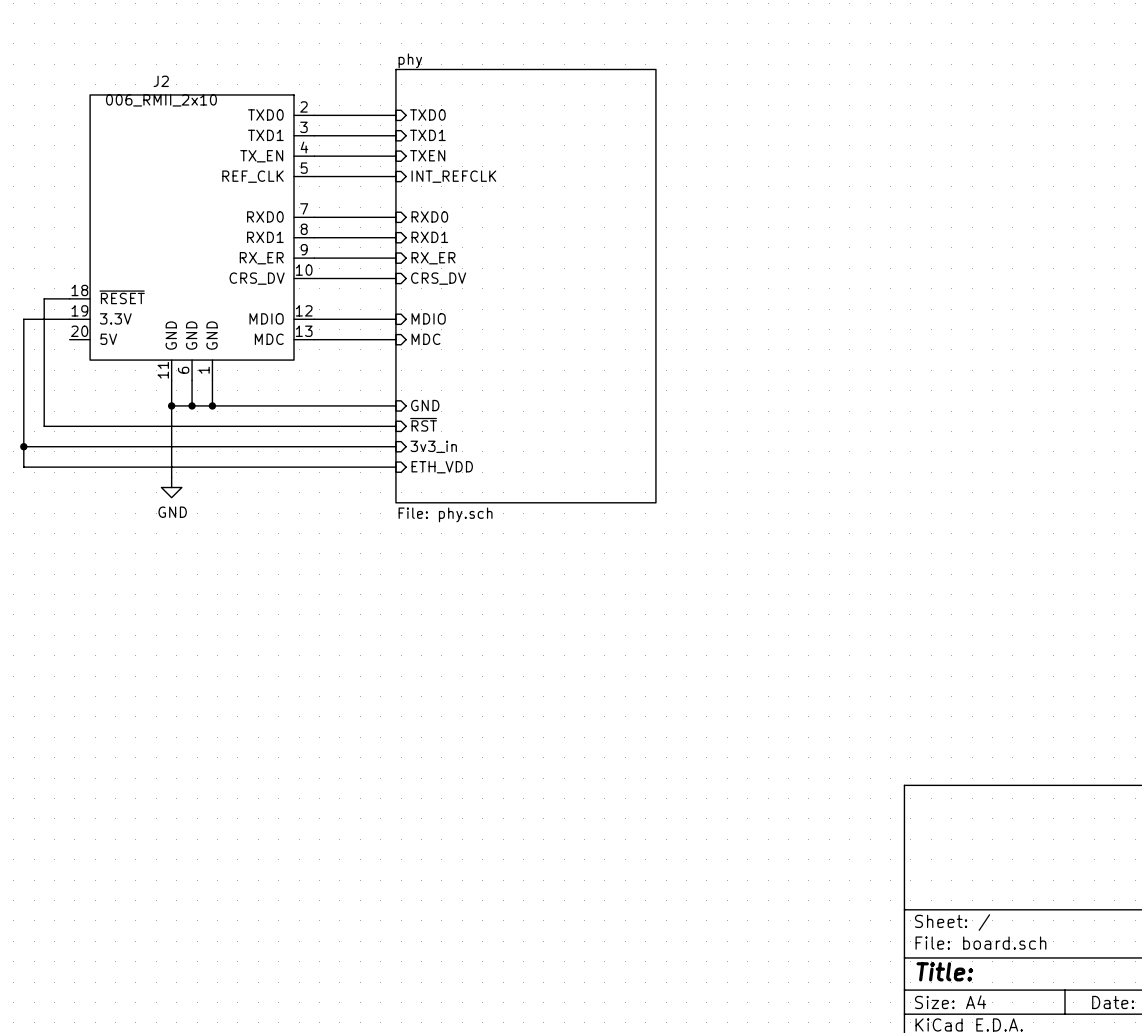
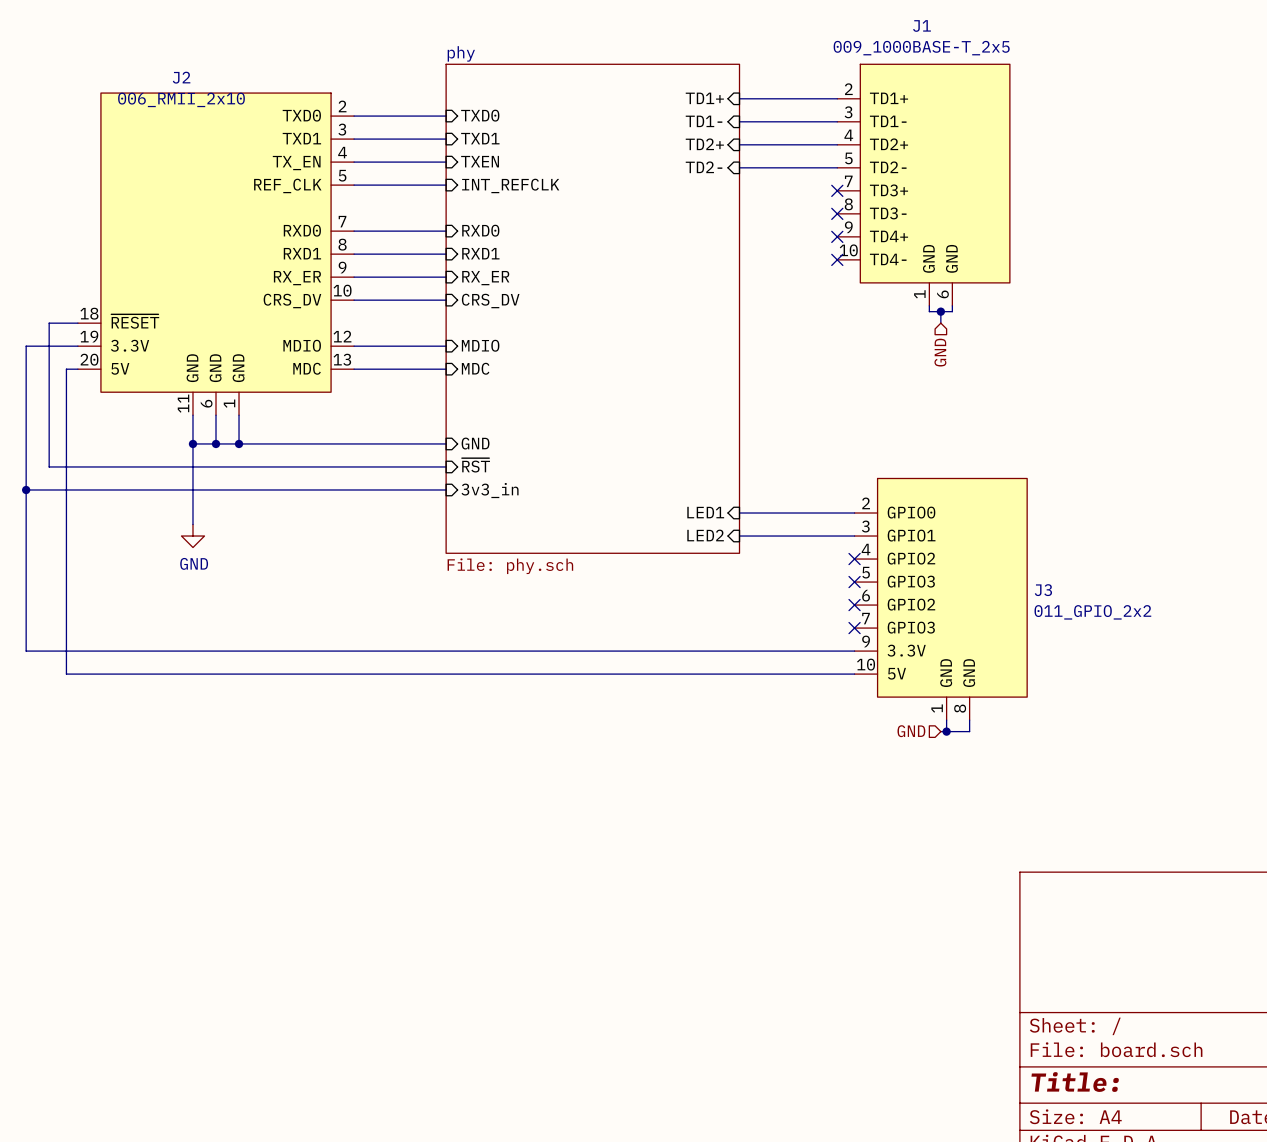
sheet pin: none -> TD1+ (704, 98)
wire: none -> (739, 98) (837, 98)
sheet pin: none -> TD1- (704, 121)
wire: none -> (739, 121) (837, 121)
sheet pin: none -> TD2+ (704, 144)
wire: none -> (739, 144) (837, 144)
sheet pin: none -> TD2- (704, 167)
wire: none -> (739, 167) (837, 167)
J1: none -> 009_1000BASE-T_2x5 (923, 185)
no-connect mark: none -> (837, 190)
no-connect mark: none -> (837, 213)
no-connect mark: none -> (837, 236)
no-connect mark: none -> (837, 259)
wire: none -> (929, 305) (929, 311) (952, 311) (952, 305)
wire: none -> (940, 311) (940, 323)
junction: none -> (940, 311)
hierarchical label: none -> GND (940, 352)
wire: none -> (77, 369) (66, 369) (66, 674) (854, 674)
sheet pin: none -> LED1 (705, 512)
wire: (23, 467) (395, 467) -> (26, 513) (26, 651) (854, 651)
sheet pin: ETH_VDD (442, 467) -> none
wire: none -> (739, 513) (854, 513)
sheet pin: none -> LED2 (705, 535)
wire: none -> (739, 536) (854, 536)
no-connect mark: none -> (854, 559)
no-connect mark: none -> (854, 582)
J3: none -> 011_GPIO_2x2 (940, 599)
no-connect mark: none -> (854, 605)
no-connect mark: none -> (854, 628)
wire: none -> (946, 720) (946, 731)
wire: none -> (969, 720) (969, 731) (940, 731)
hierarchical label: none -> GND (911, 731)
junction: none -> (946, 731)

